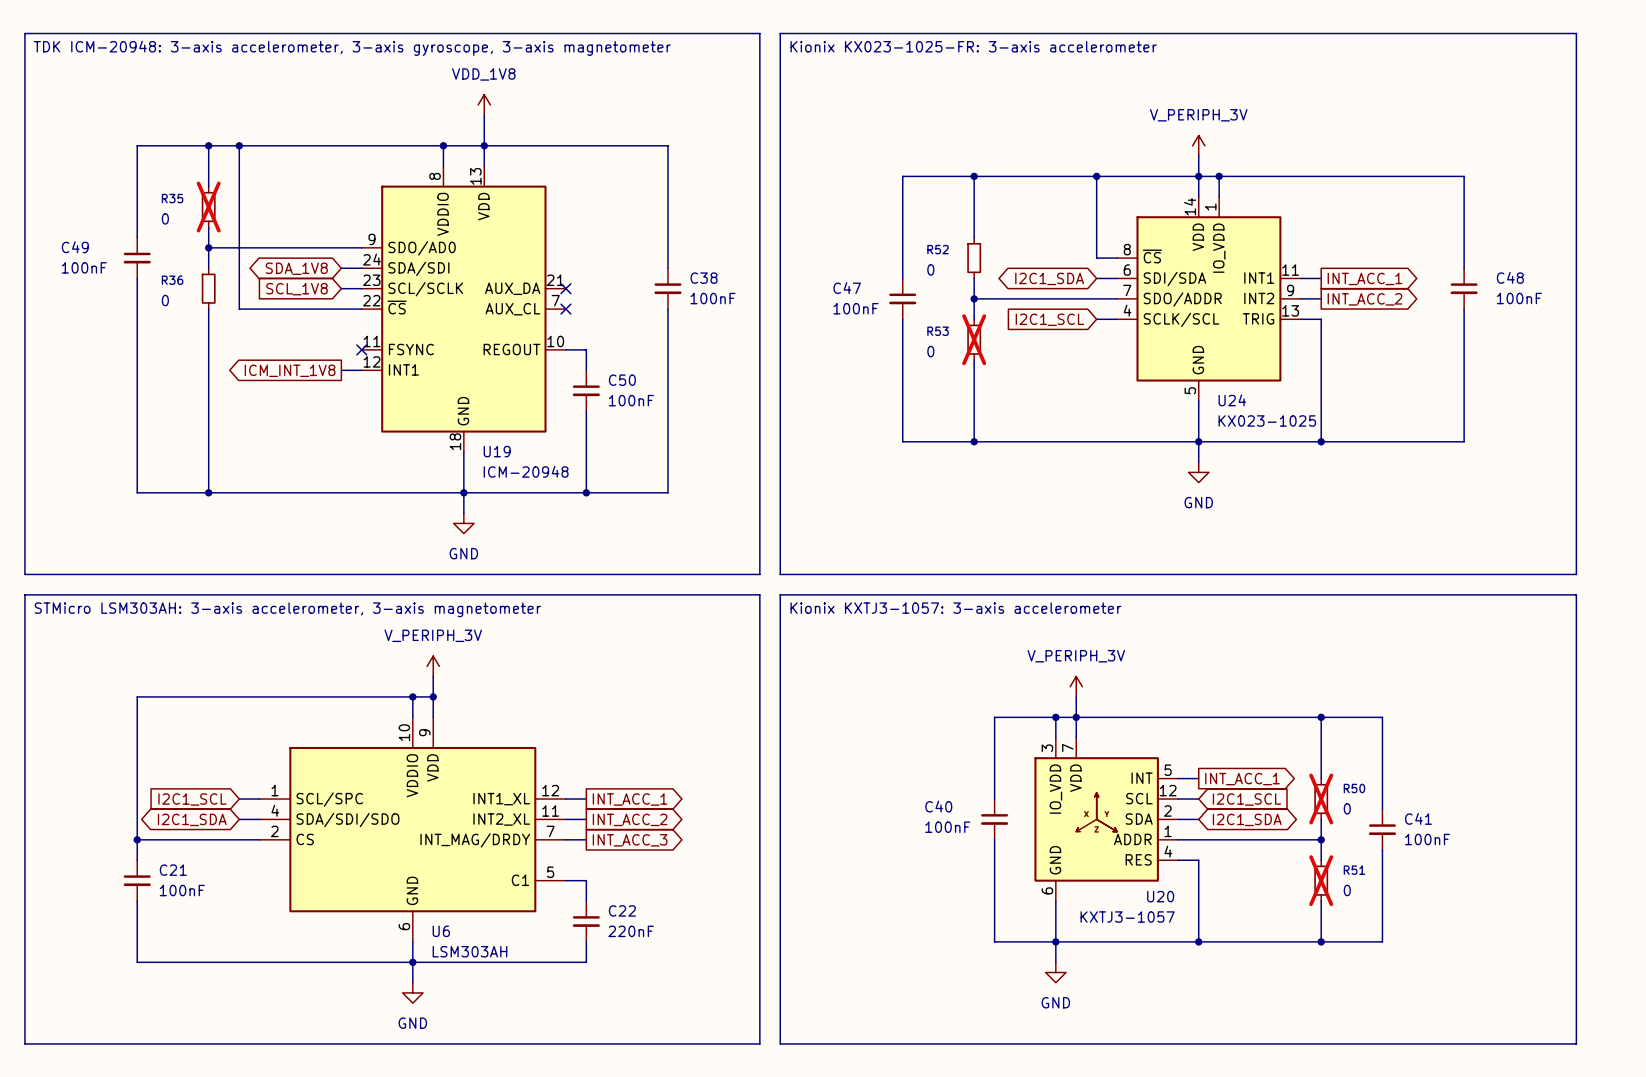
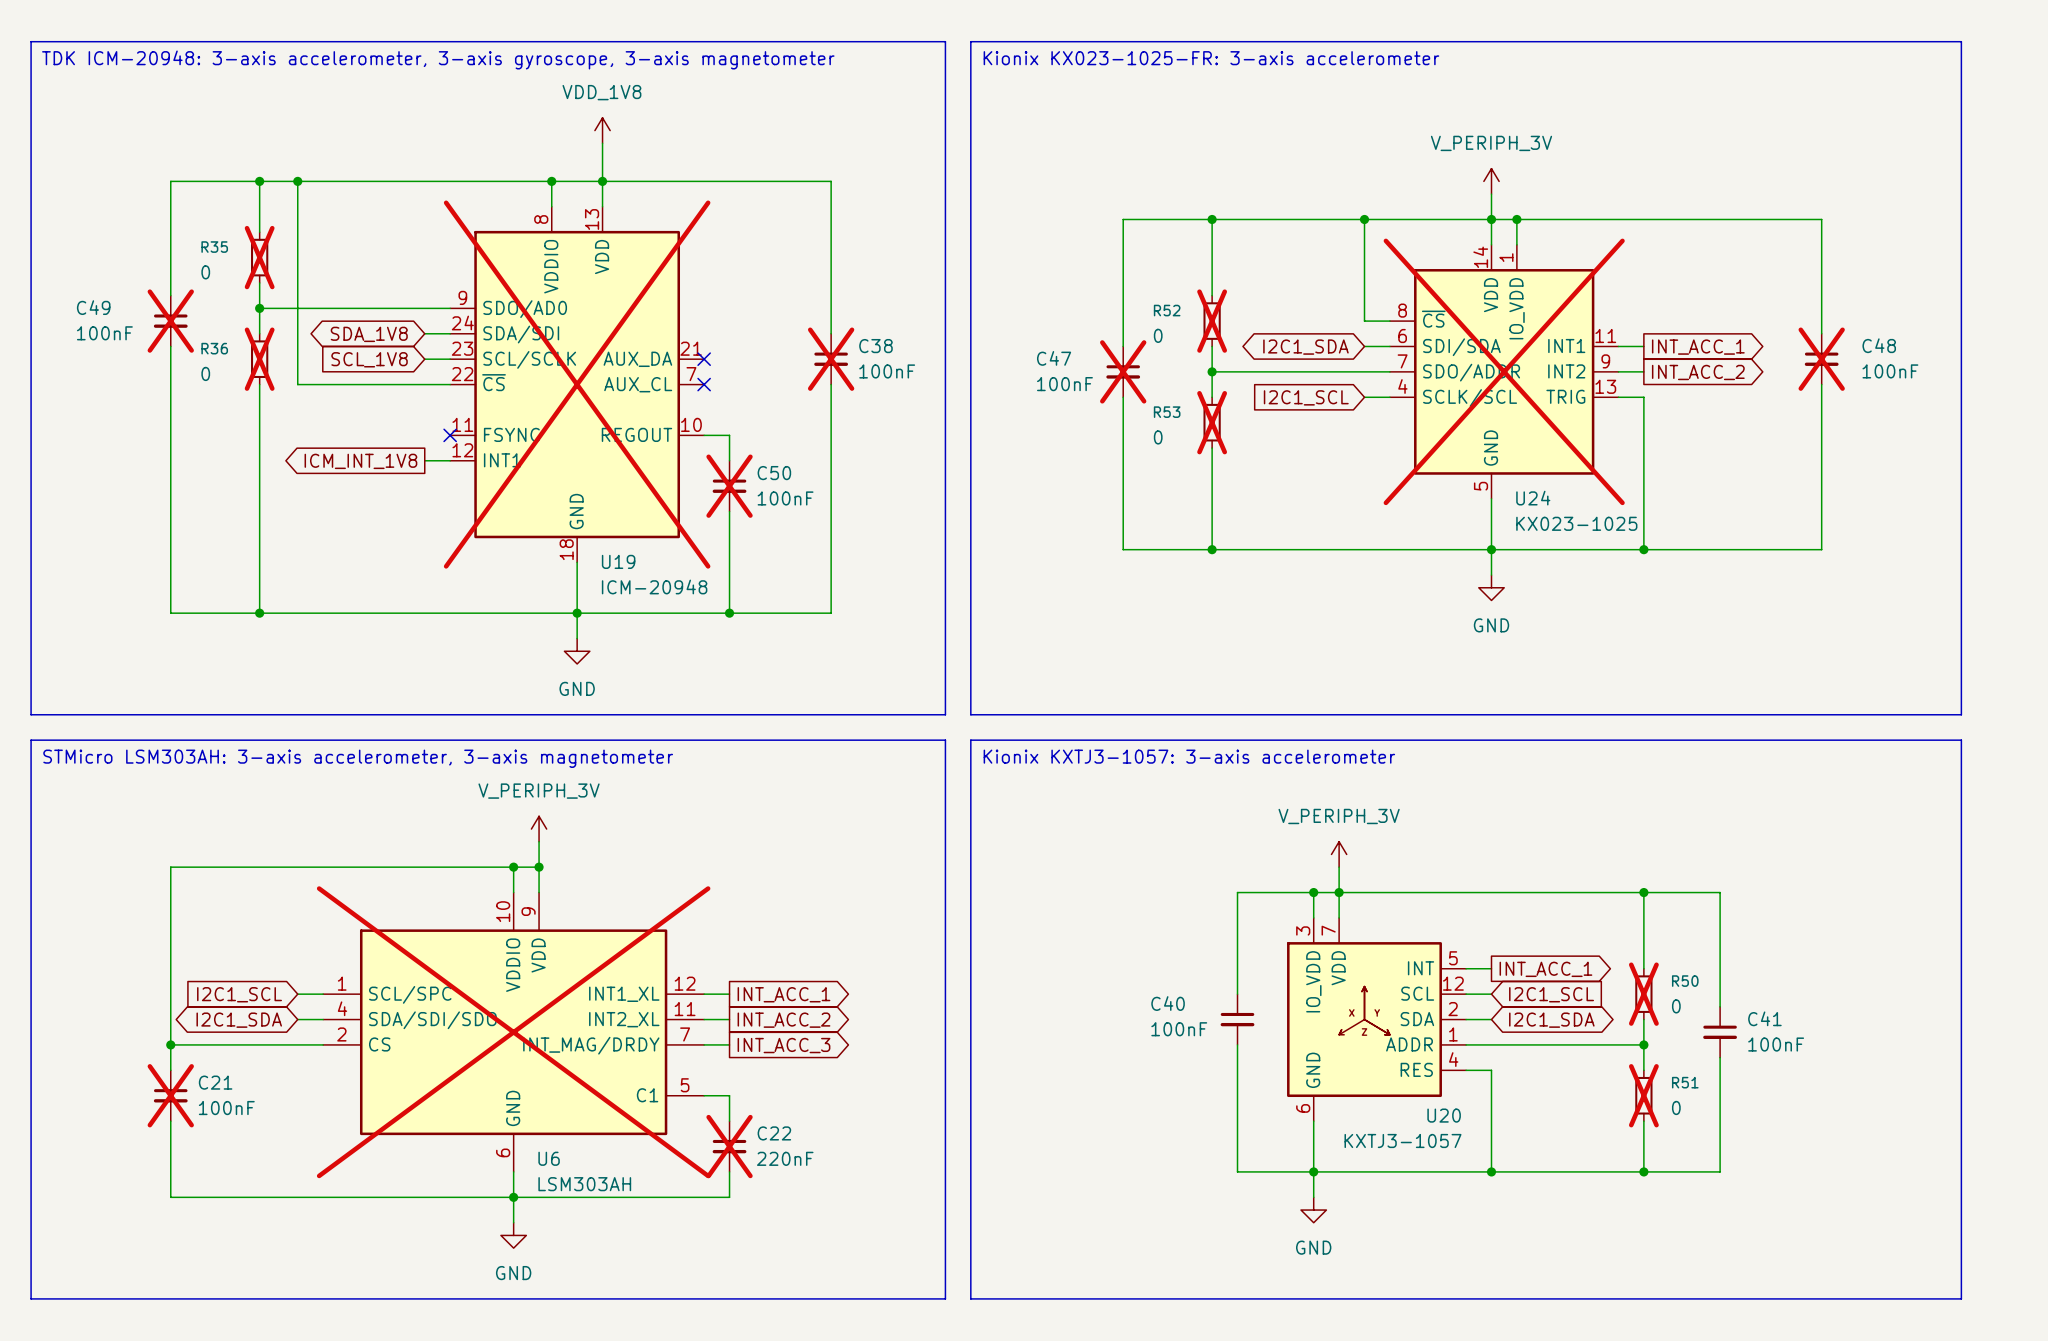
C49 do-not-place cross: none -> (170, 321)
R52 do-not-place cross: none -> (1212, 321)
R36 do-not-place cross: none -> (259, 359)
C38 do-not-place cross: none -> (831, 359)
C48 do-not-place cross: none -> (1821, 359)
C47 do-not-place cross: none -> (1123, 371)
U24 do-not-place cross: none -> (1504, 371)
U19 do-not-place cross: none -> (577, 384)
C50 do-not-place cross: none -> (729, 486)
U6 do-not-place cross: none -> (513, 1032)
C21 do-not-place cross: none -> (170, 1095)
C22 do-not-place cross: none -> (729, 1146)

